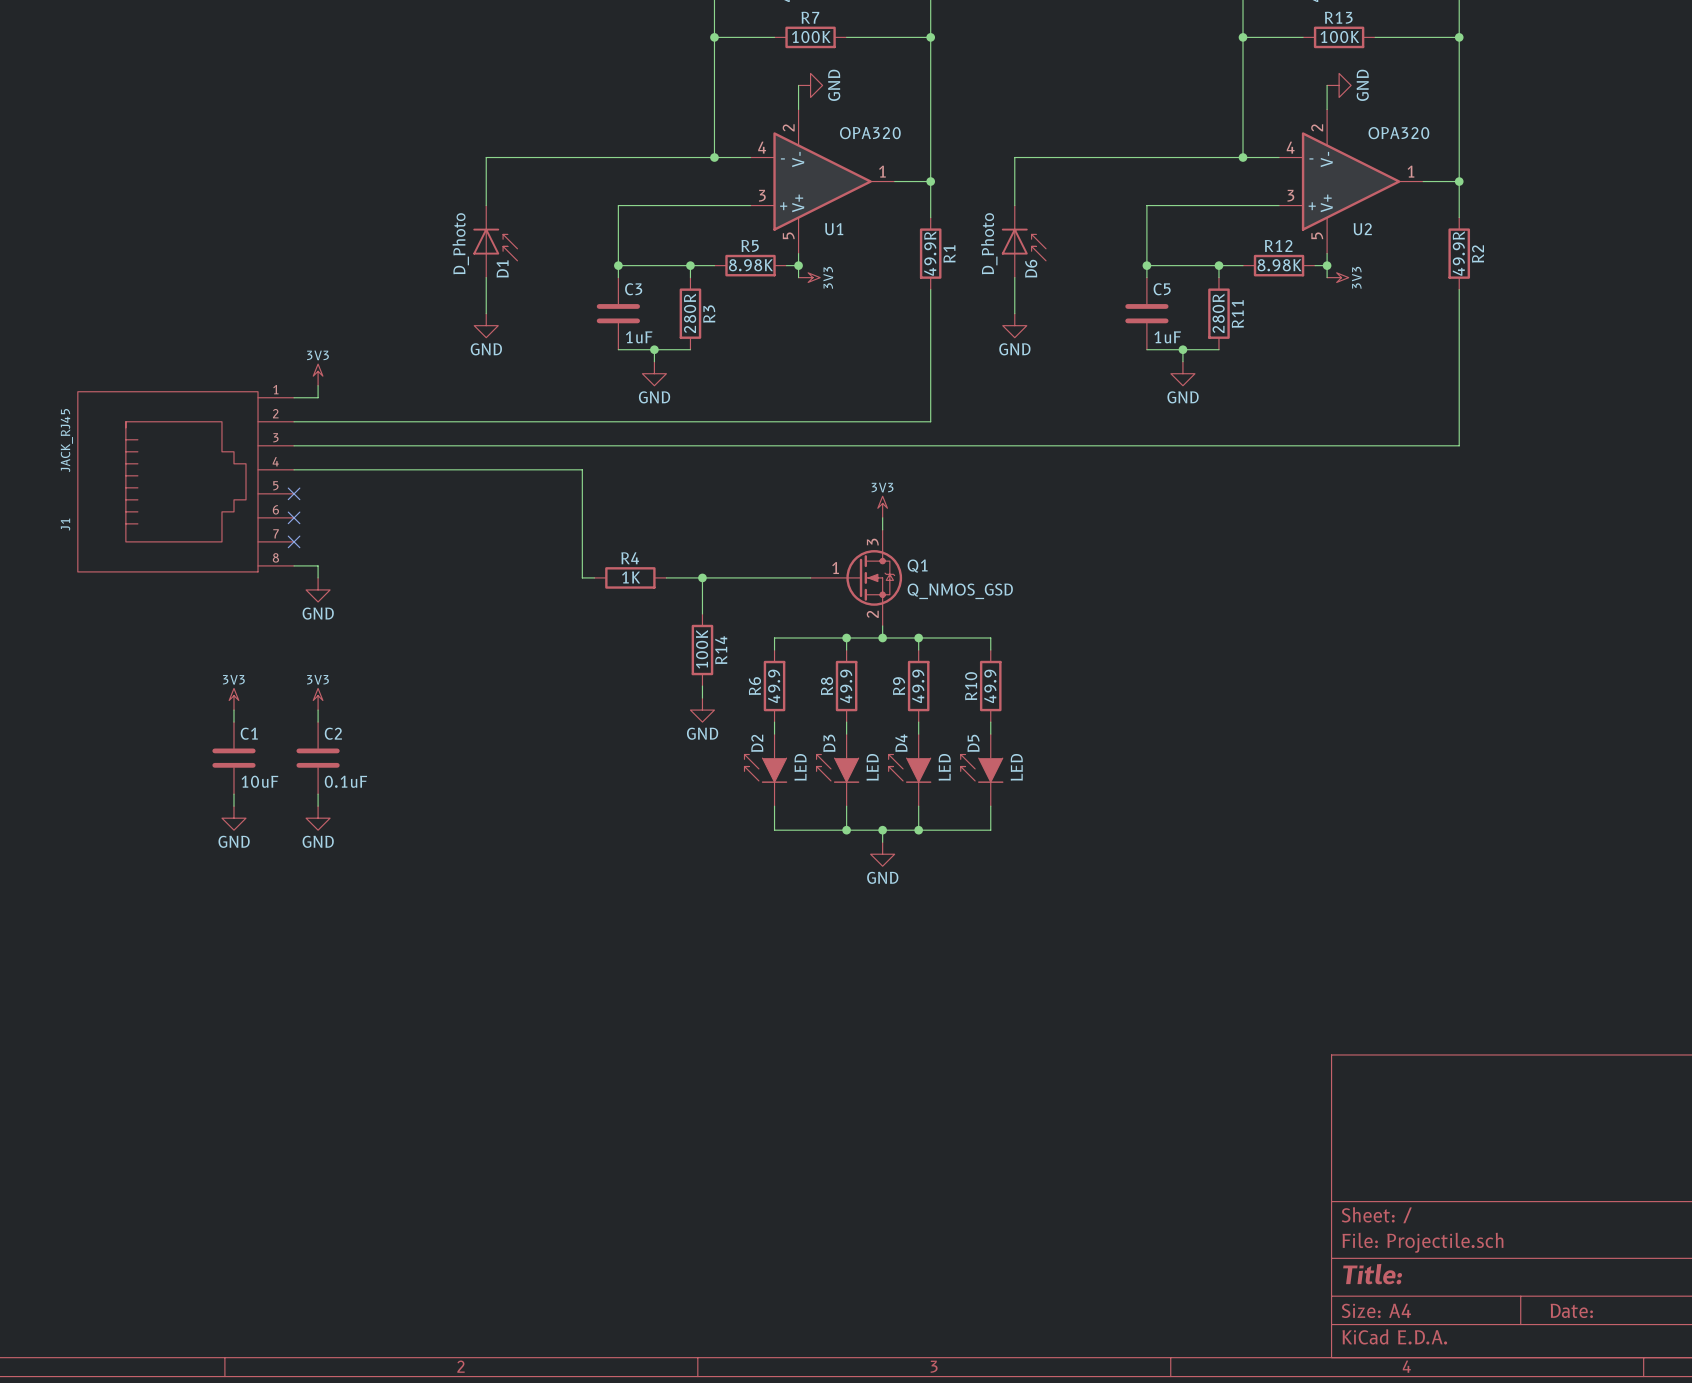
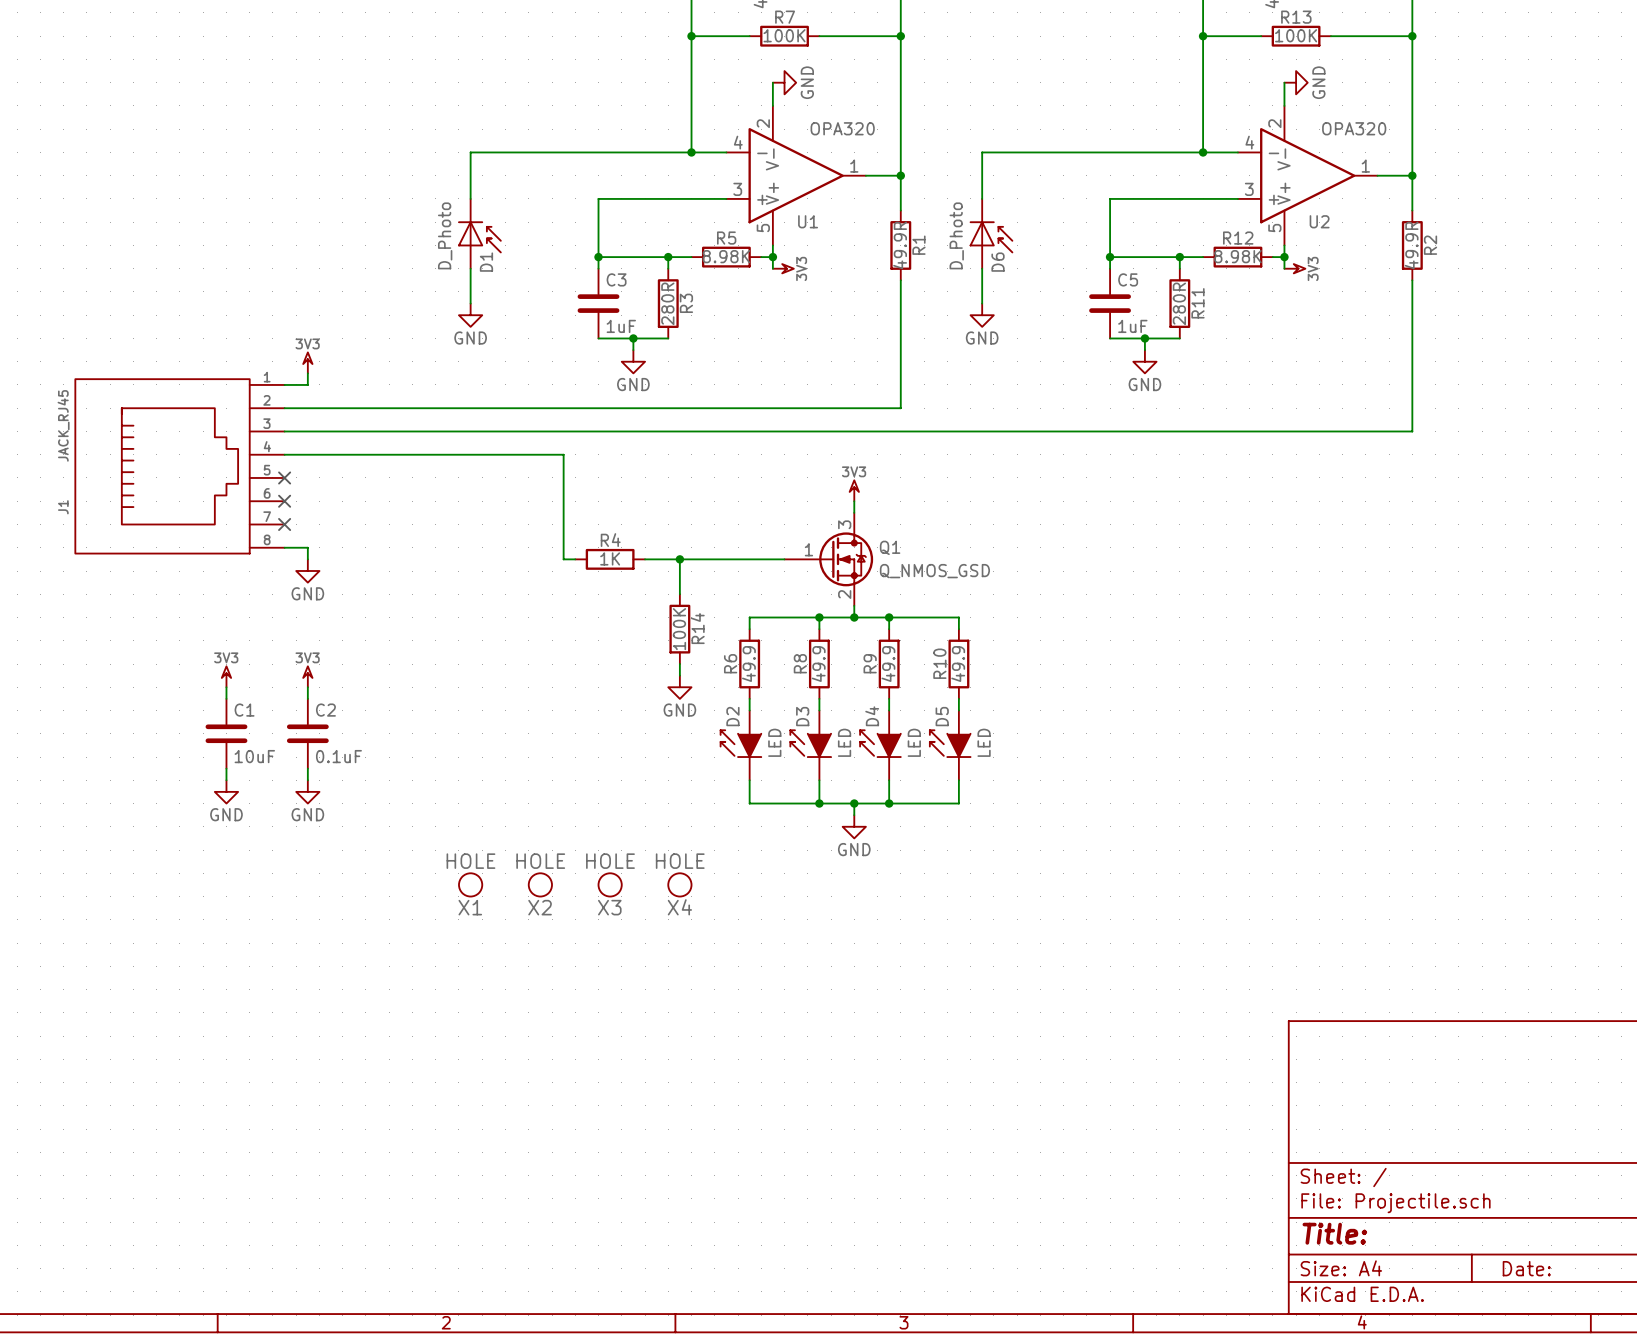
X1: none -> HOLE (470, 884)
X2: none -> HOLE (540, 884)
X3: none -> HOLE (610, 884)
X4: none -> HOLE (679, 884)

